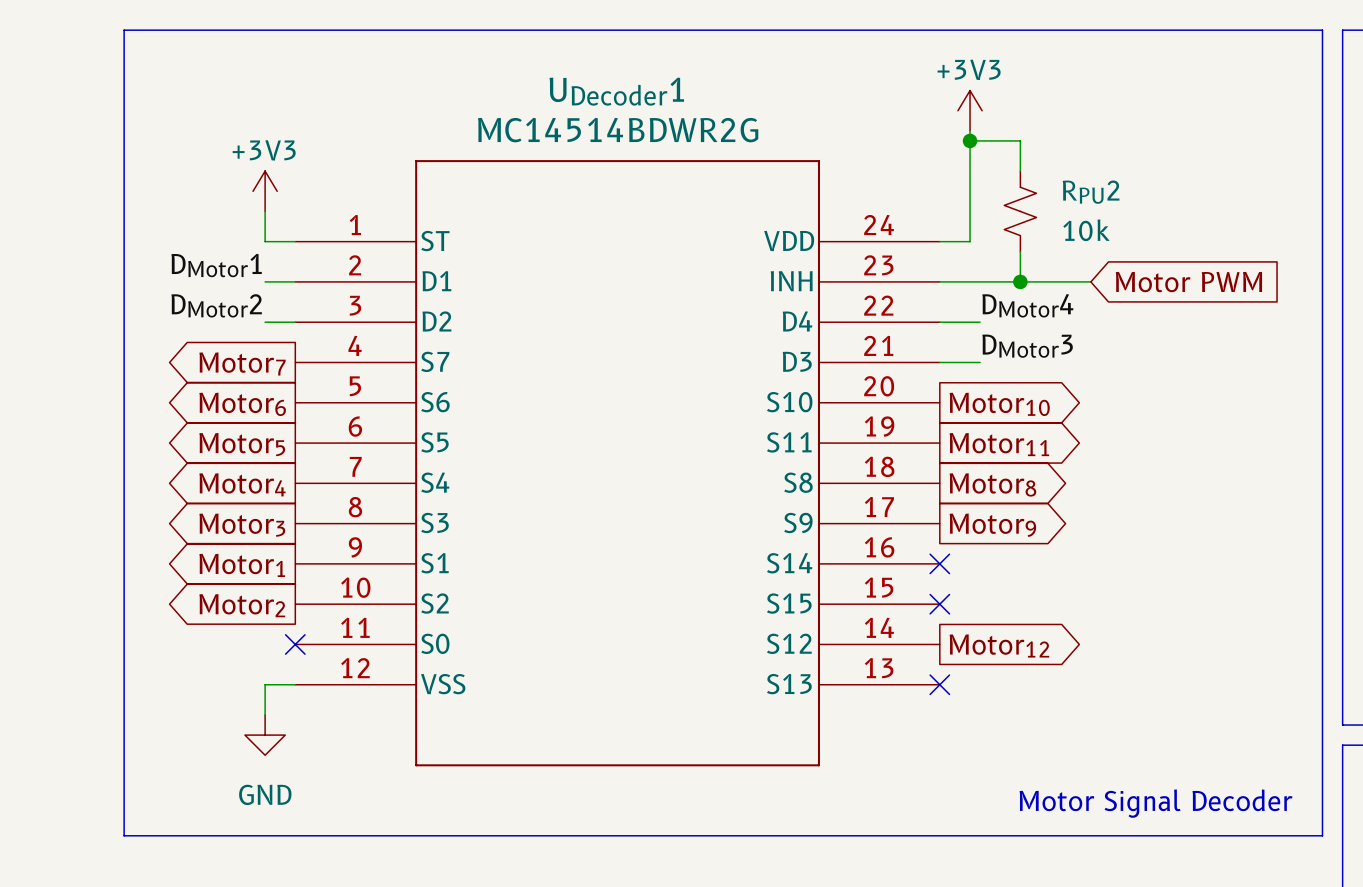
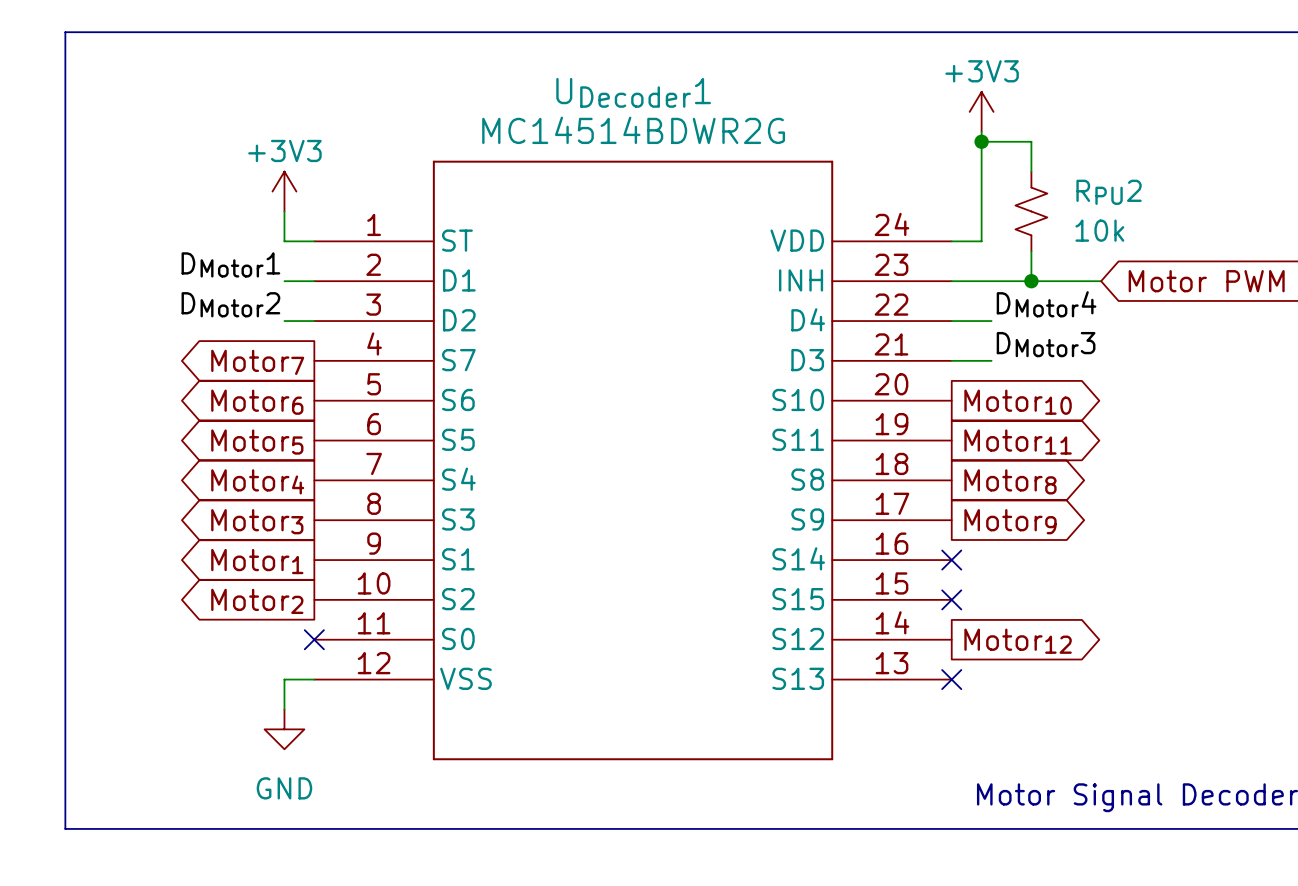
line: (124, 30) (124, 835) -> (145, 32) (65, 32) (65, 828) (145, 828)

